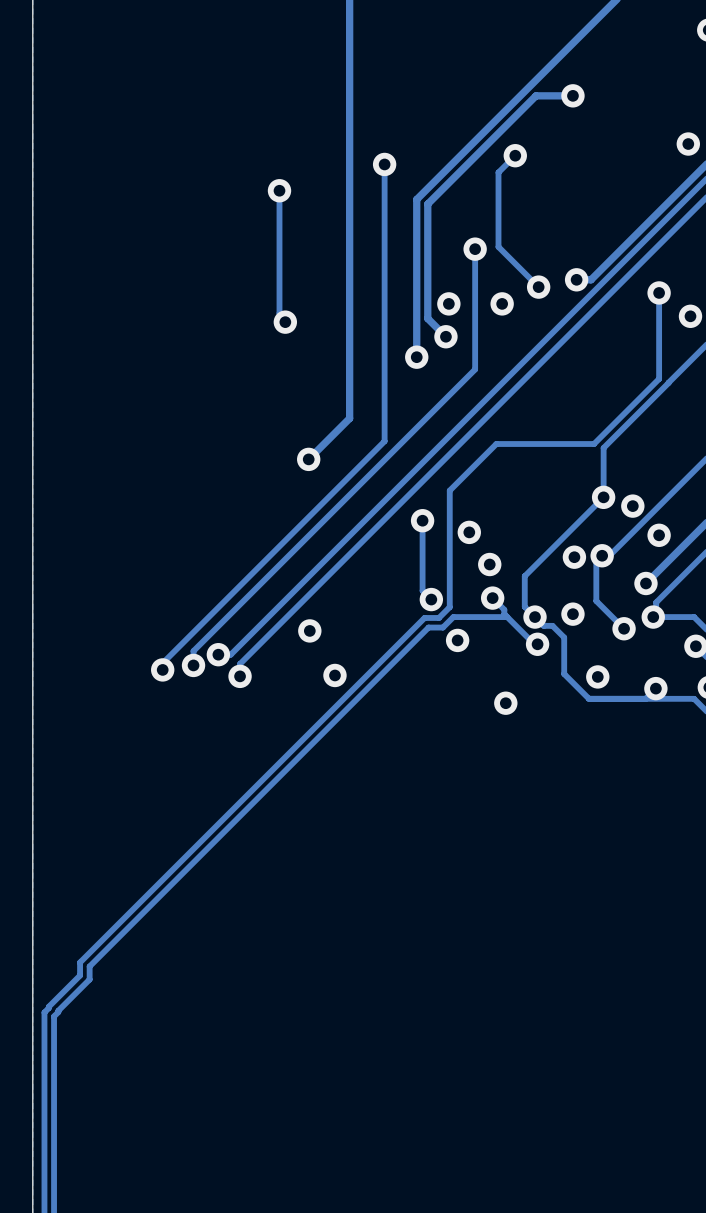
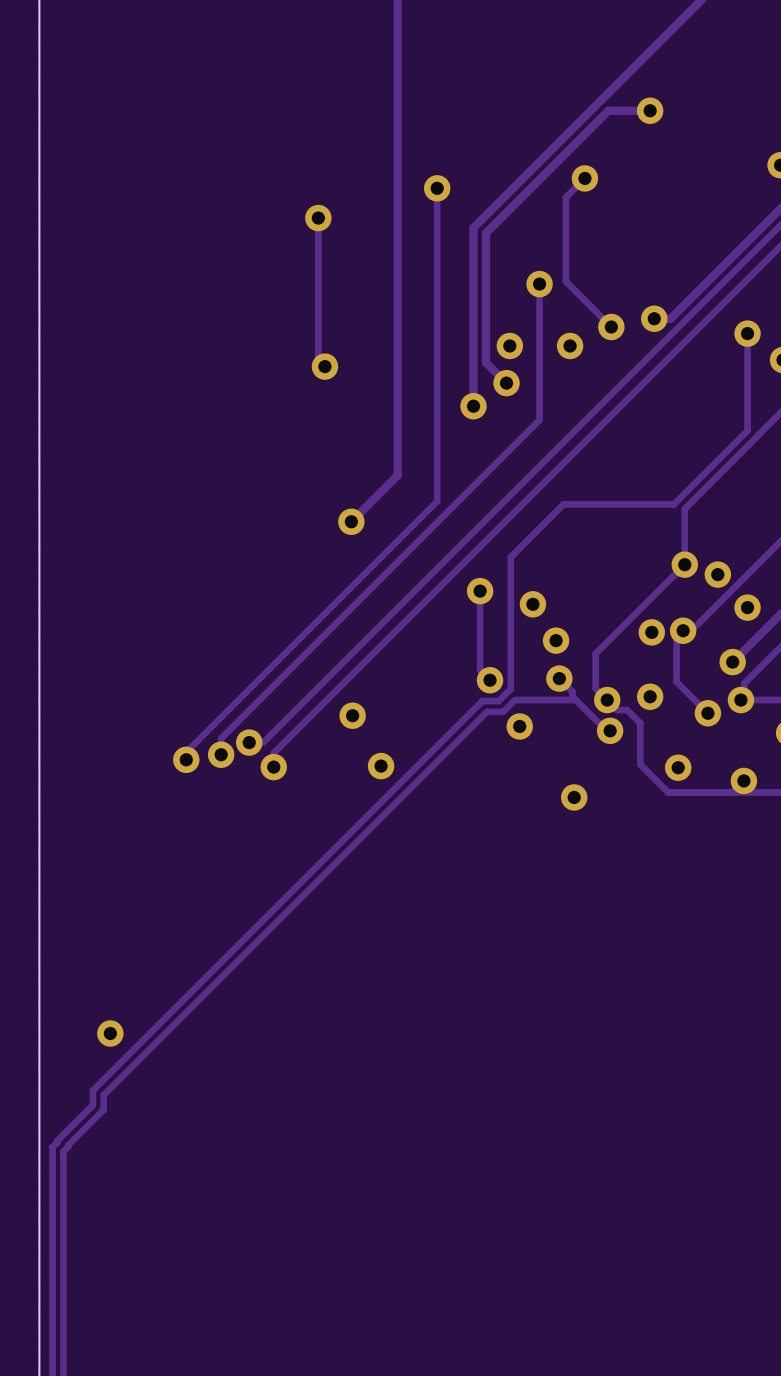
via: none -> (110, 1033)

